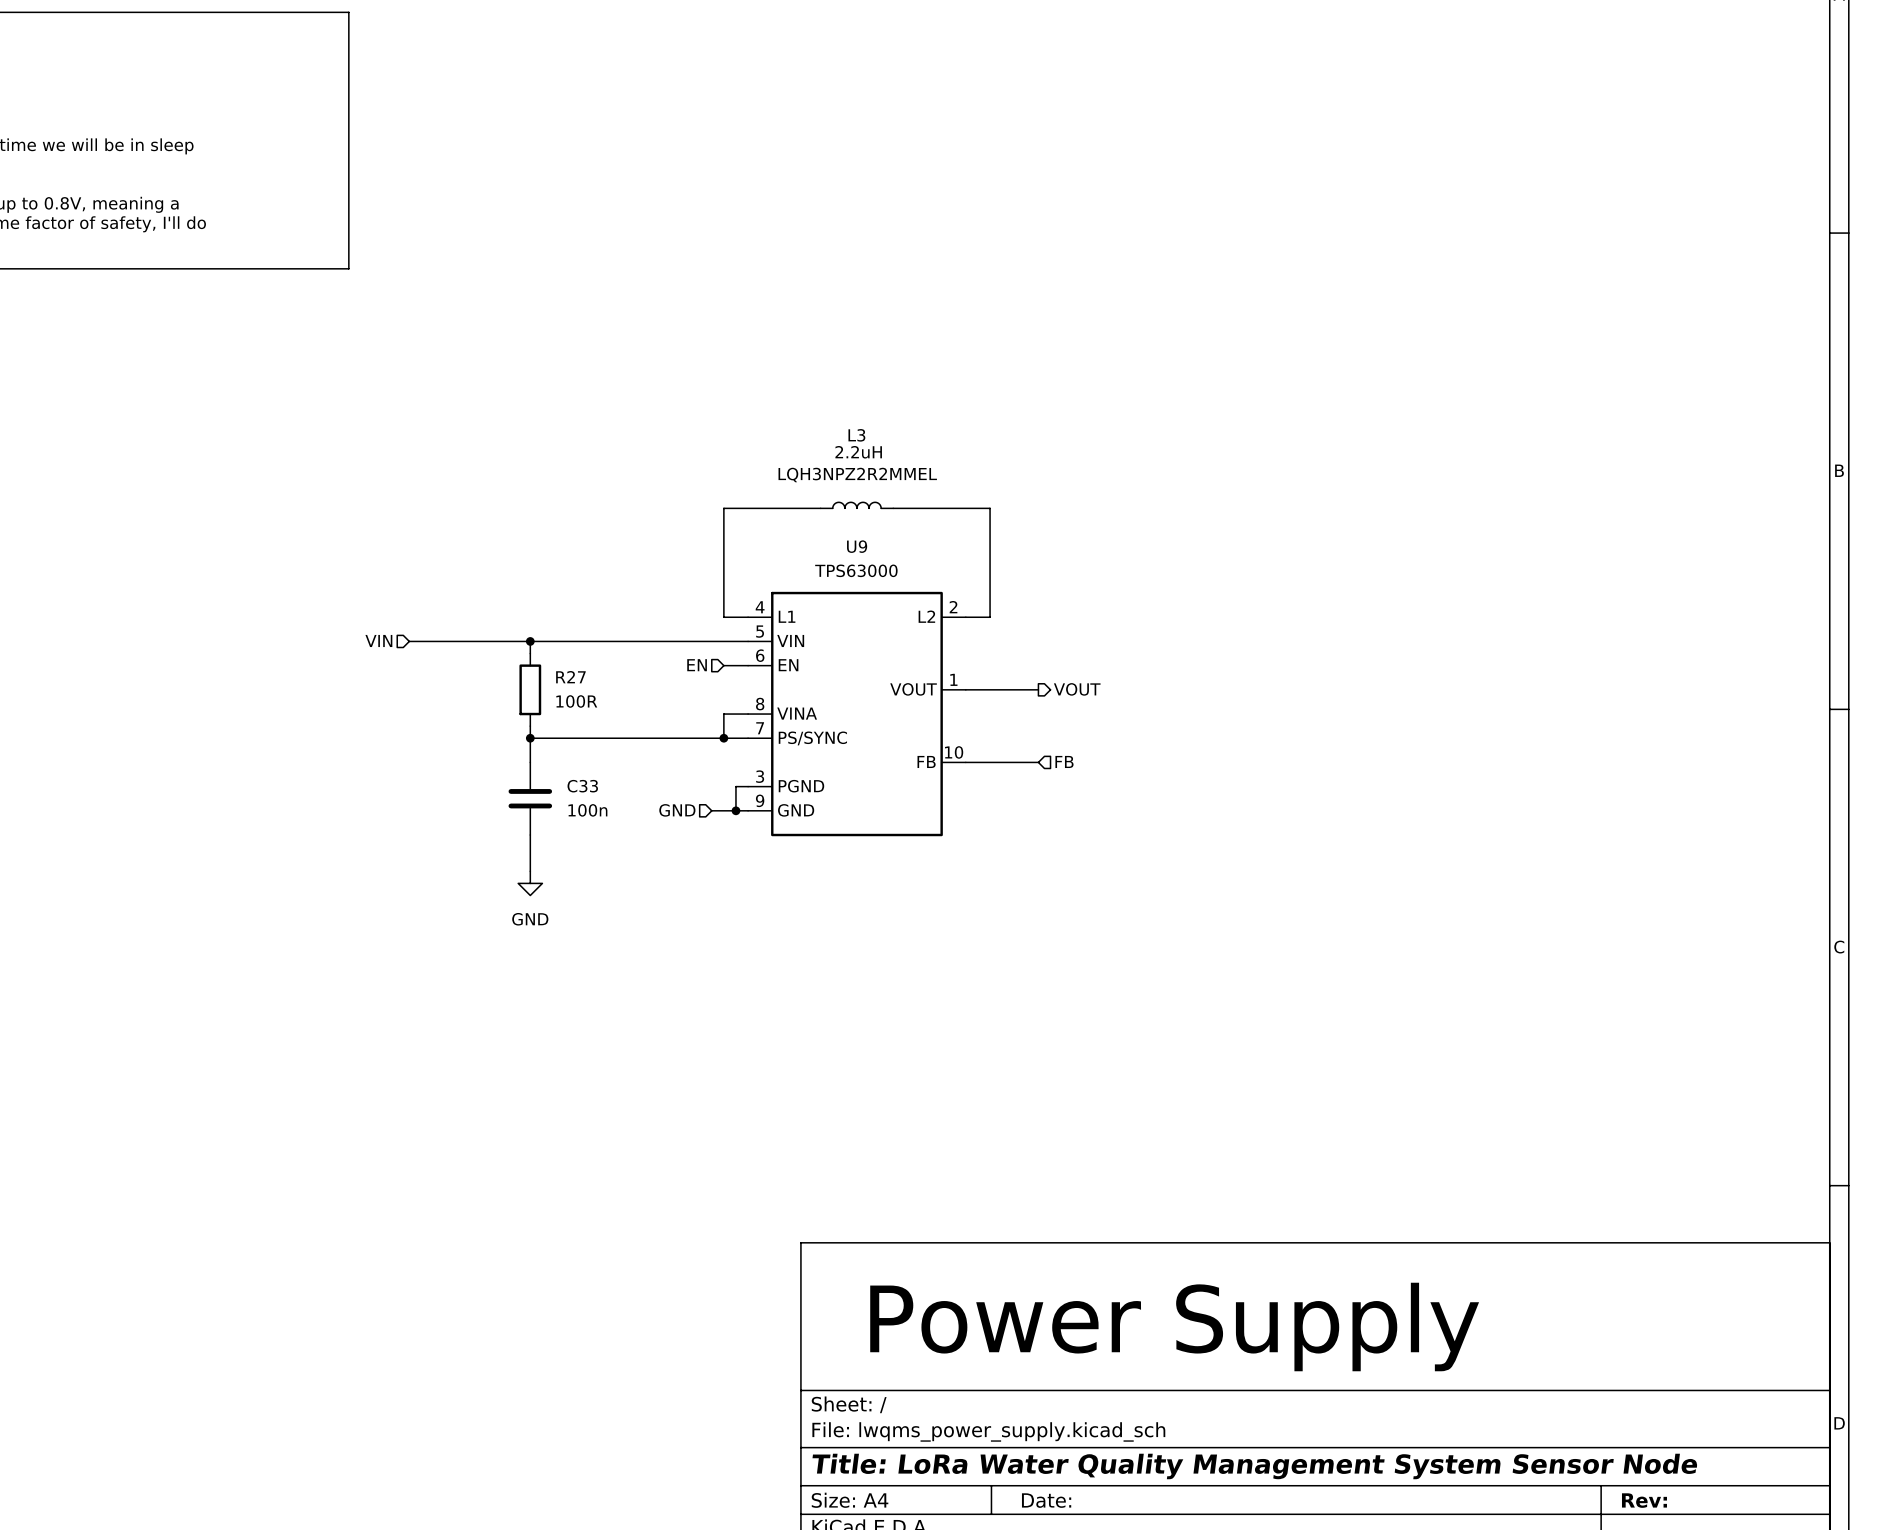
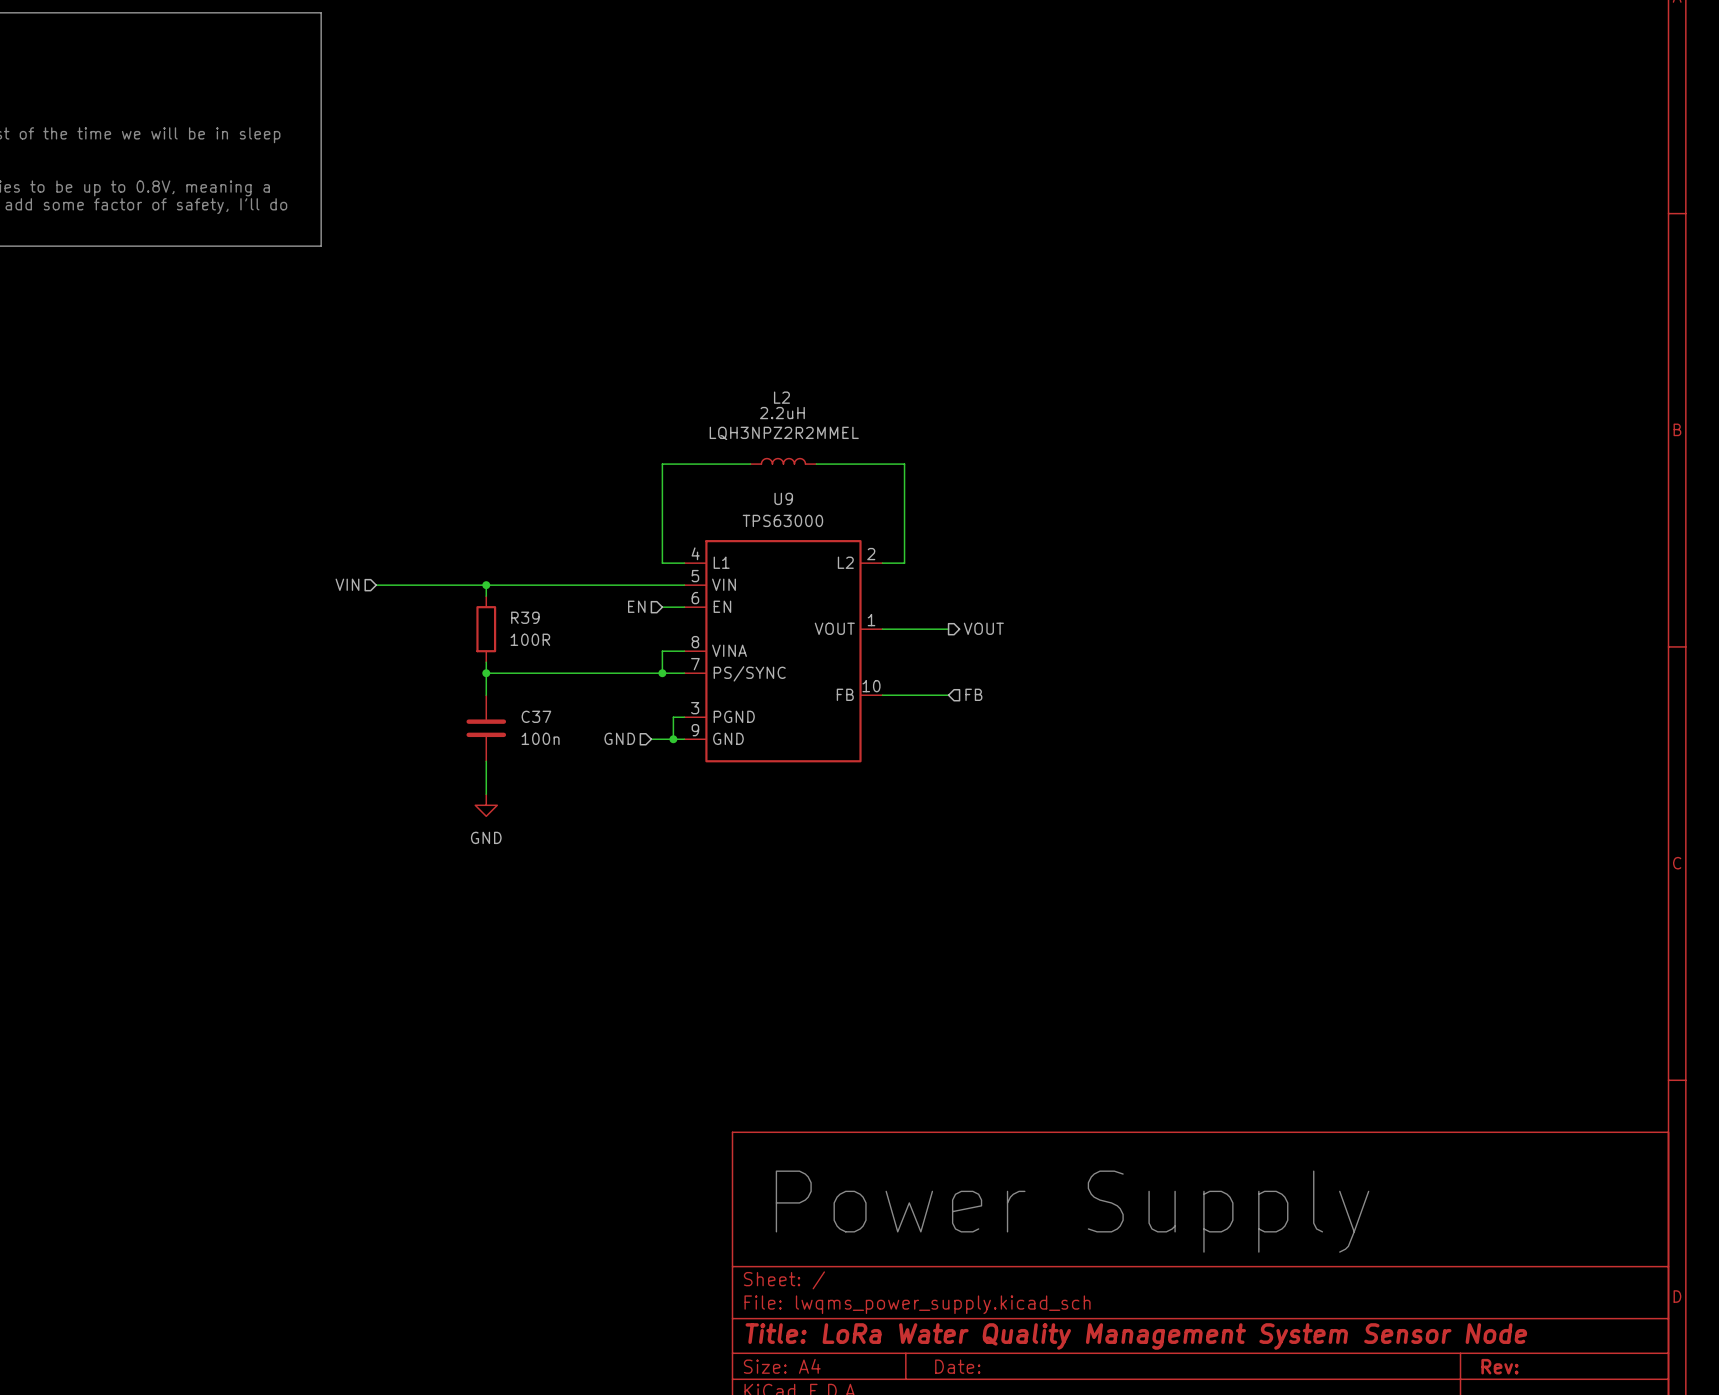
L3 name: L3 (856, 435) -> L2 (781, 397)
R27 name: R27 (570, 677) -> R39 (525, 617)
C33 name: C33 (582, 786) -> C37 (536, 716)

